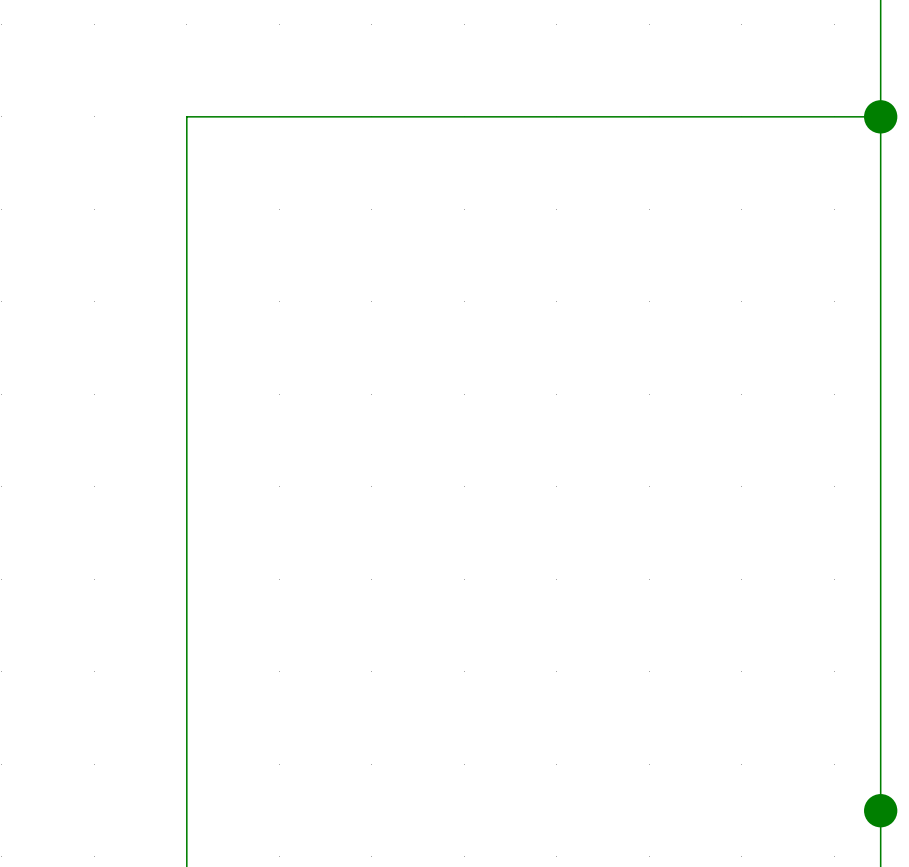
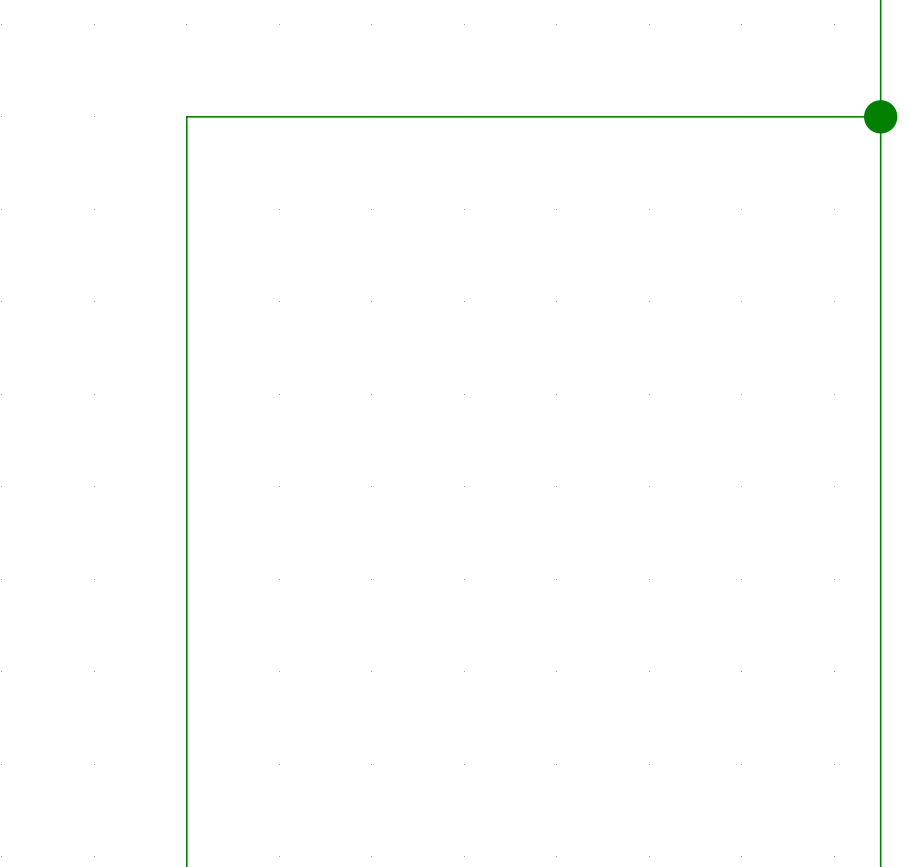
junction: (880, 810) -> none

